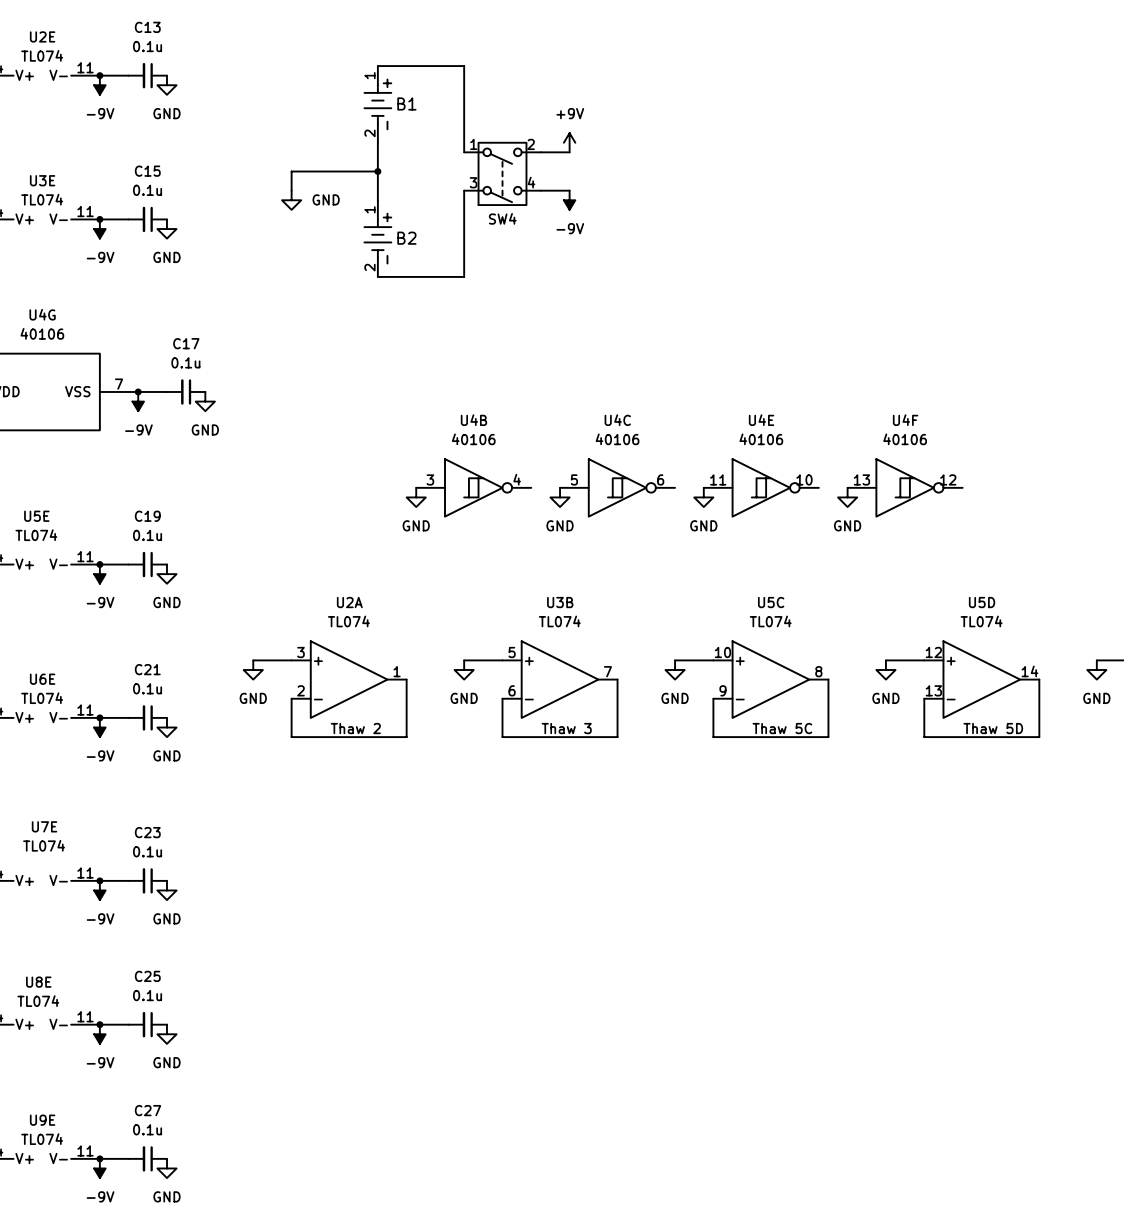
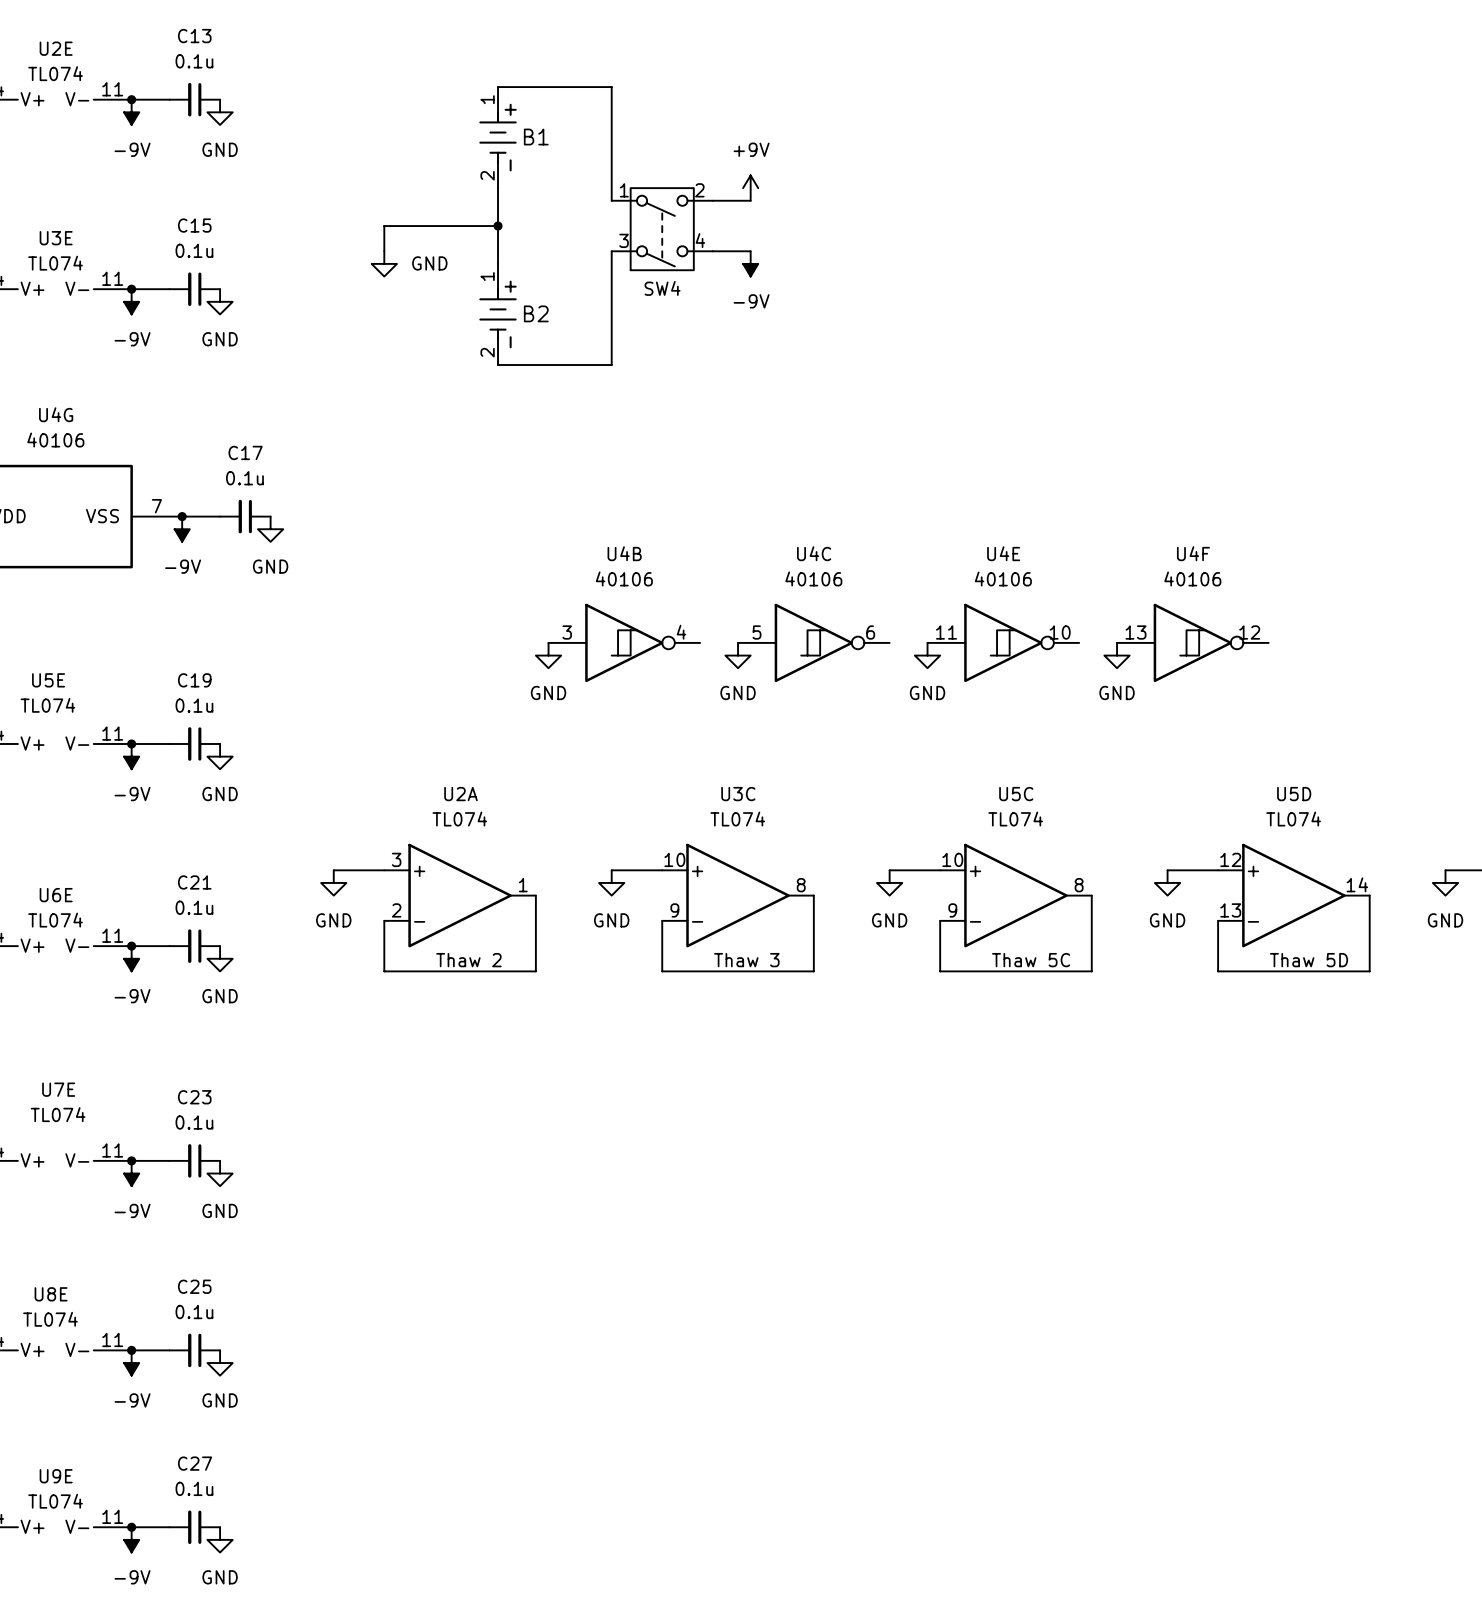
U3B name: U3B (560, 602) -> U3C (738, 794)
U3B pin number: 5 (512, 652) -> 10 (674, 859)
U3B pin number: 7 (607, 671) -> 8 (801, 885)
U3B pin number: 6 (512, 690) -> 9 (674, 910)

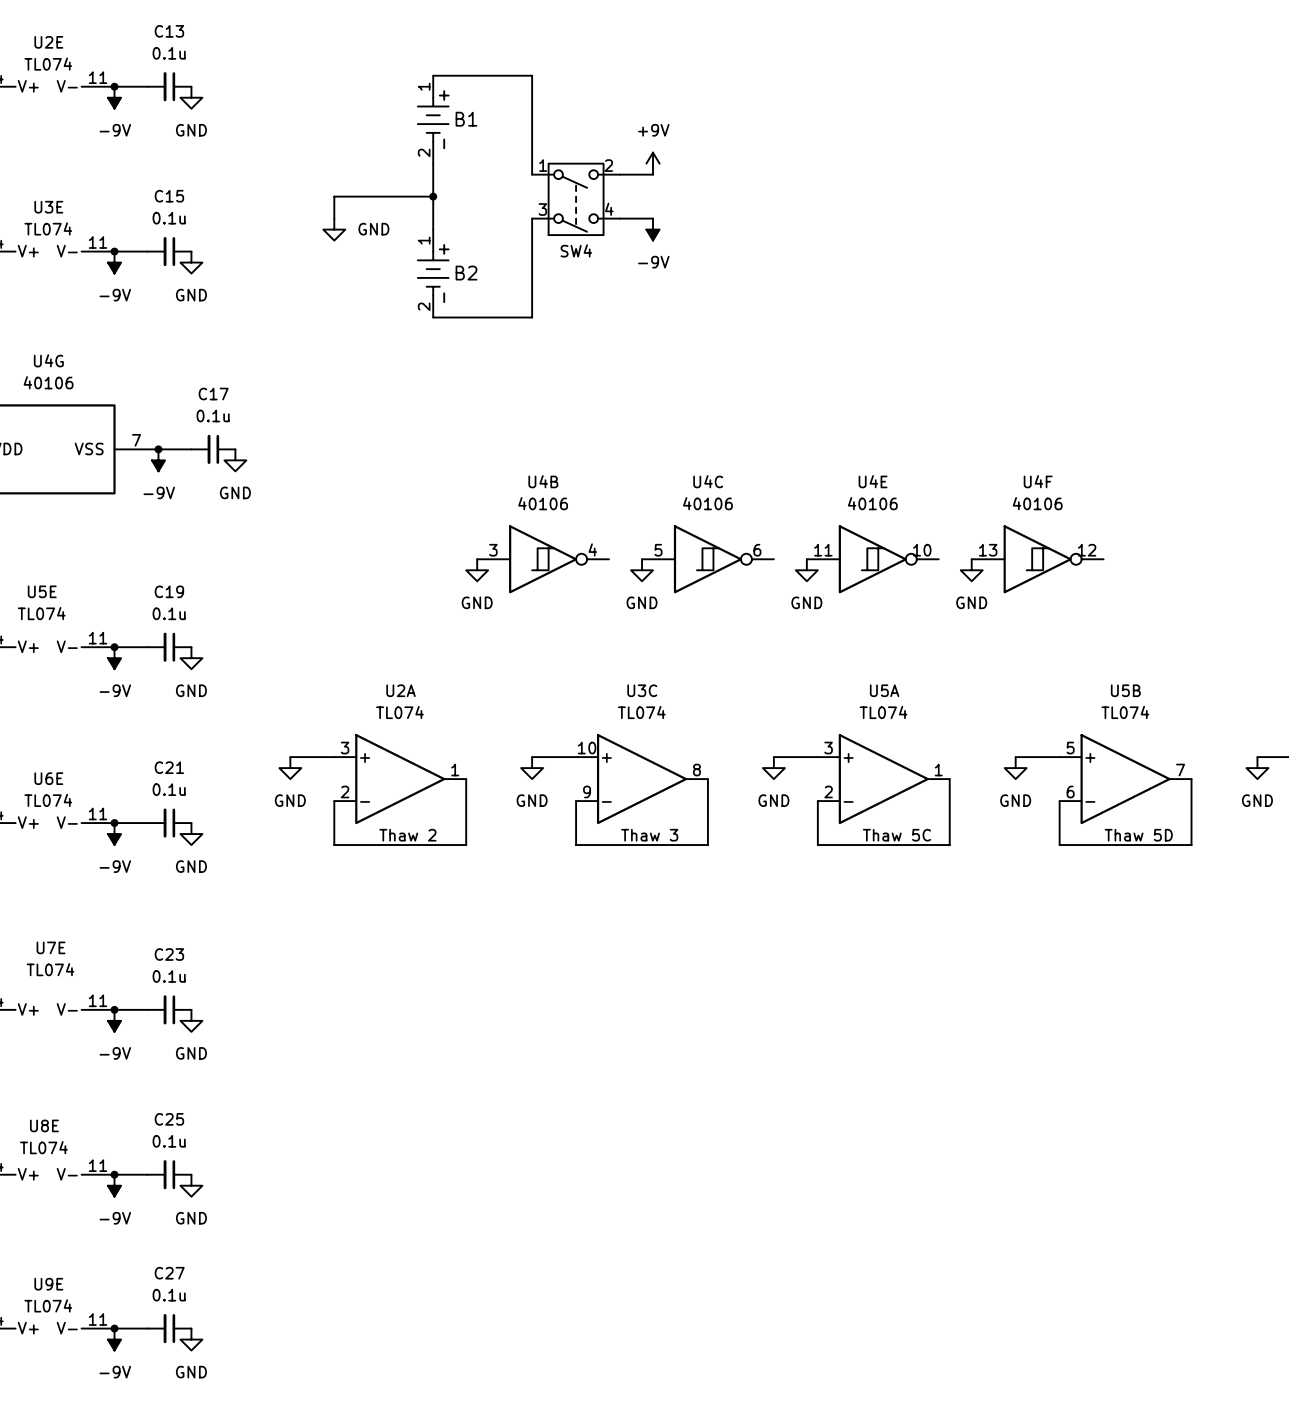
U5C name: U5C (1016, 794) -> U5A (884, 690)
U5D name: U5D (1294, 794) -> U5B (1125, 690)
U5C pin number: 10 (952, 859) -> 3 (828, 748)
U5D pin number: 12 (1230, 859) -> 5 (1070, 748)
U5D pin number: 14 (1357, 884) -> 7 (1180, 770)
U5C pin number: 8 (1079, 885) -> 1 (938, 770)
U5C pin number: 9 (952, 910) -> 2 (828, 791)
U5D pin number: 13 (1230, 910) -> 6 (1070, 791)

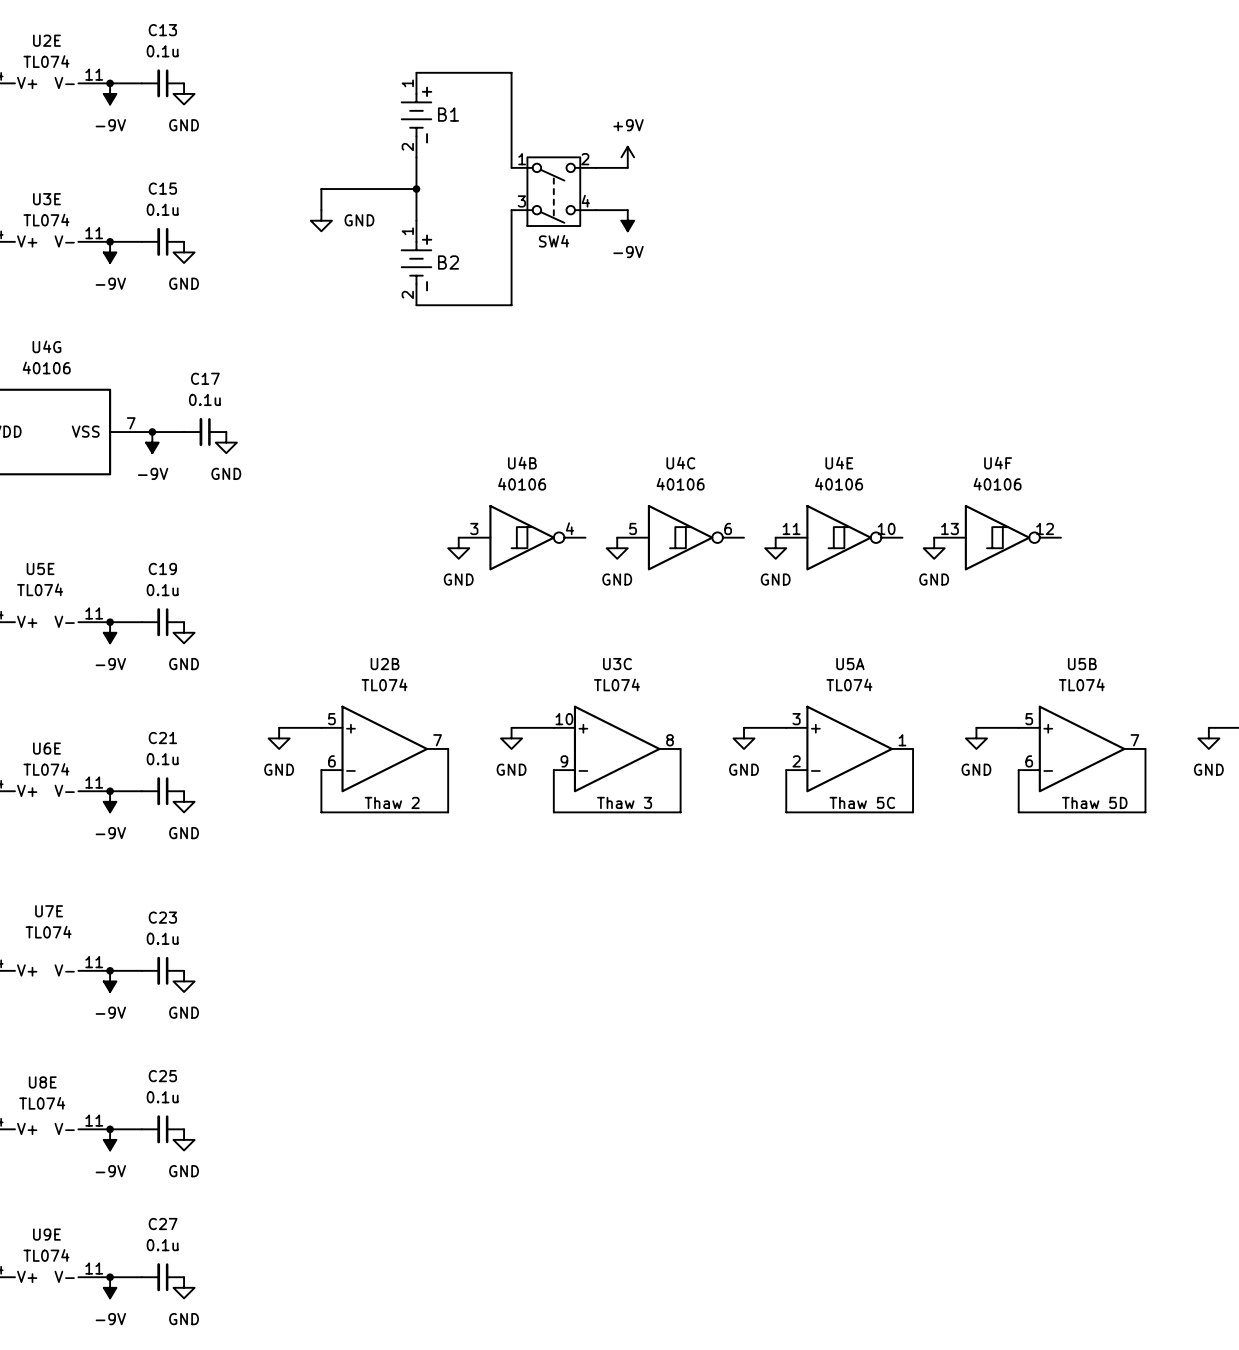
U2A name: U2A (401, 690) -> U2B (385, 664)
U2A pin number: 3 (345, 748) -> 5 (331, 719)
U2A pin number: 1 (455, 770) -> 7 (437, 740)
U2A pin number: 2 (345, 791) -> 6 (331, 761)

